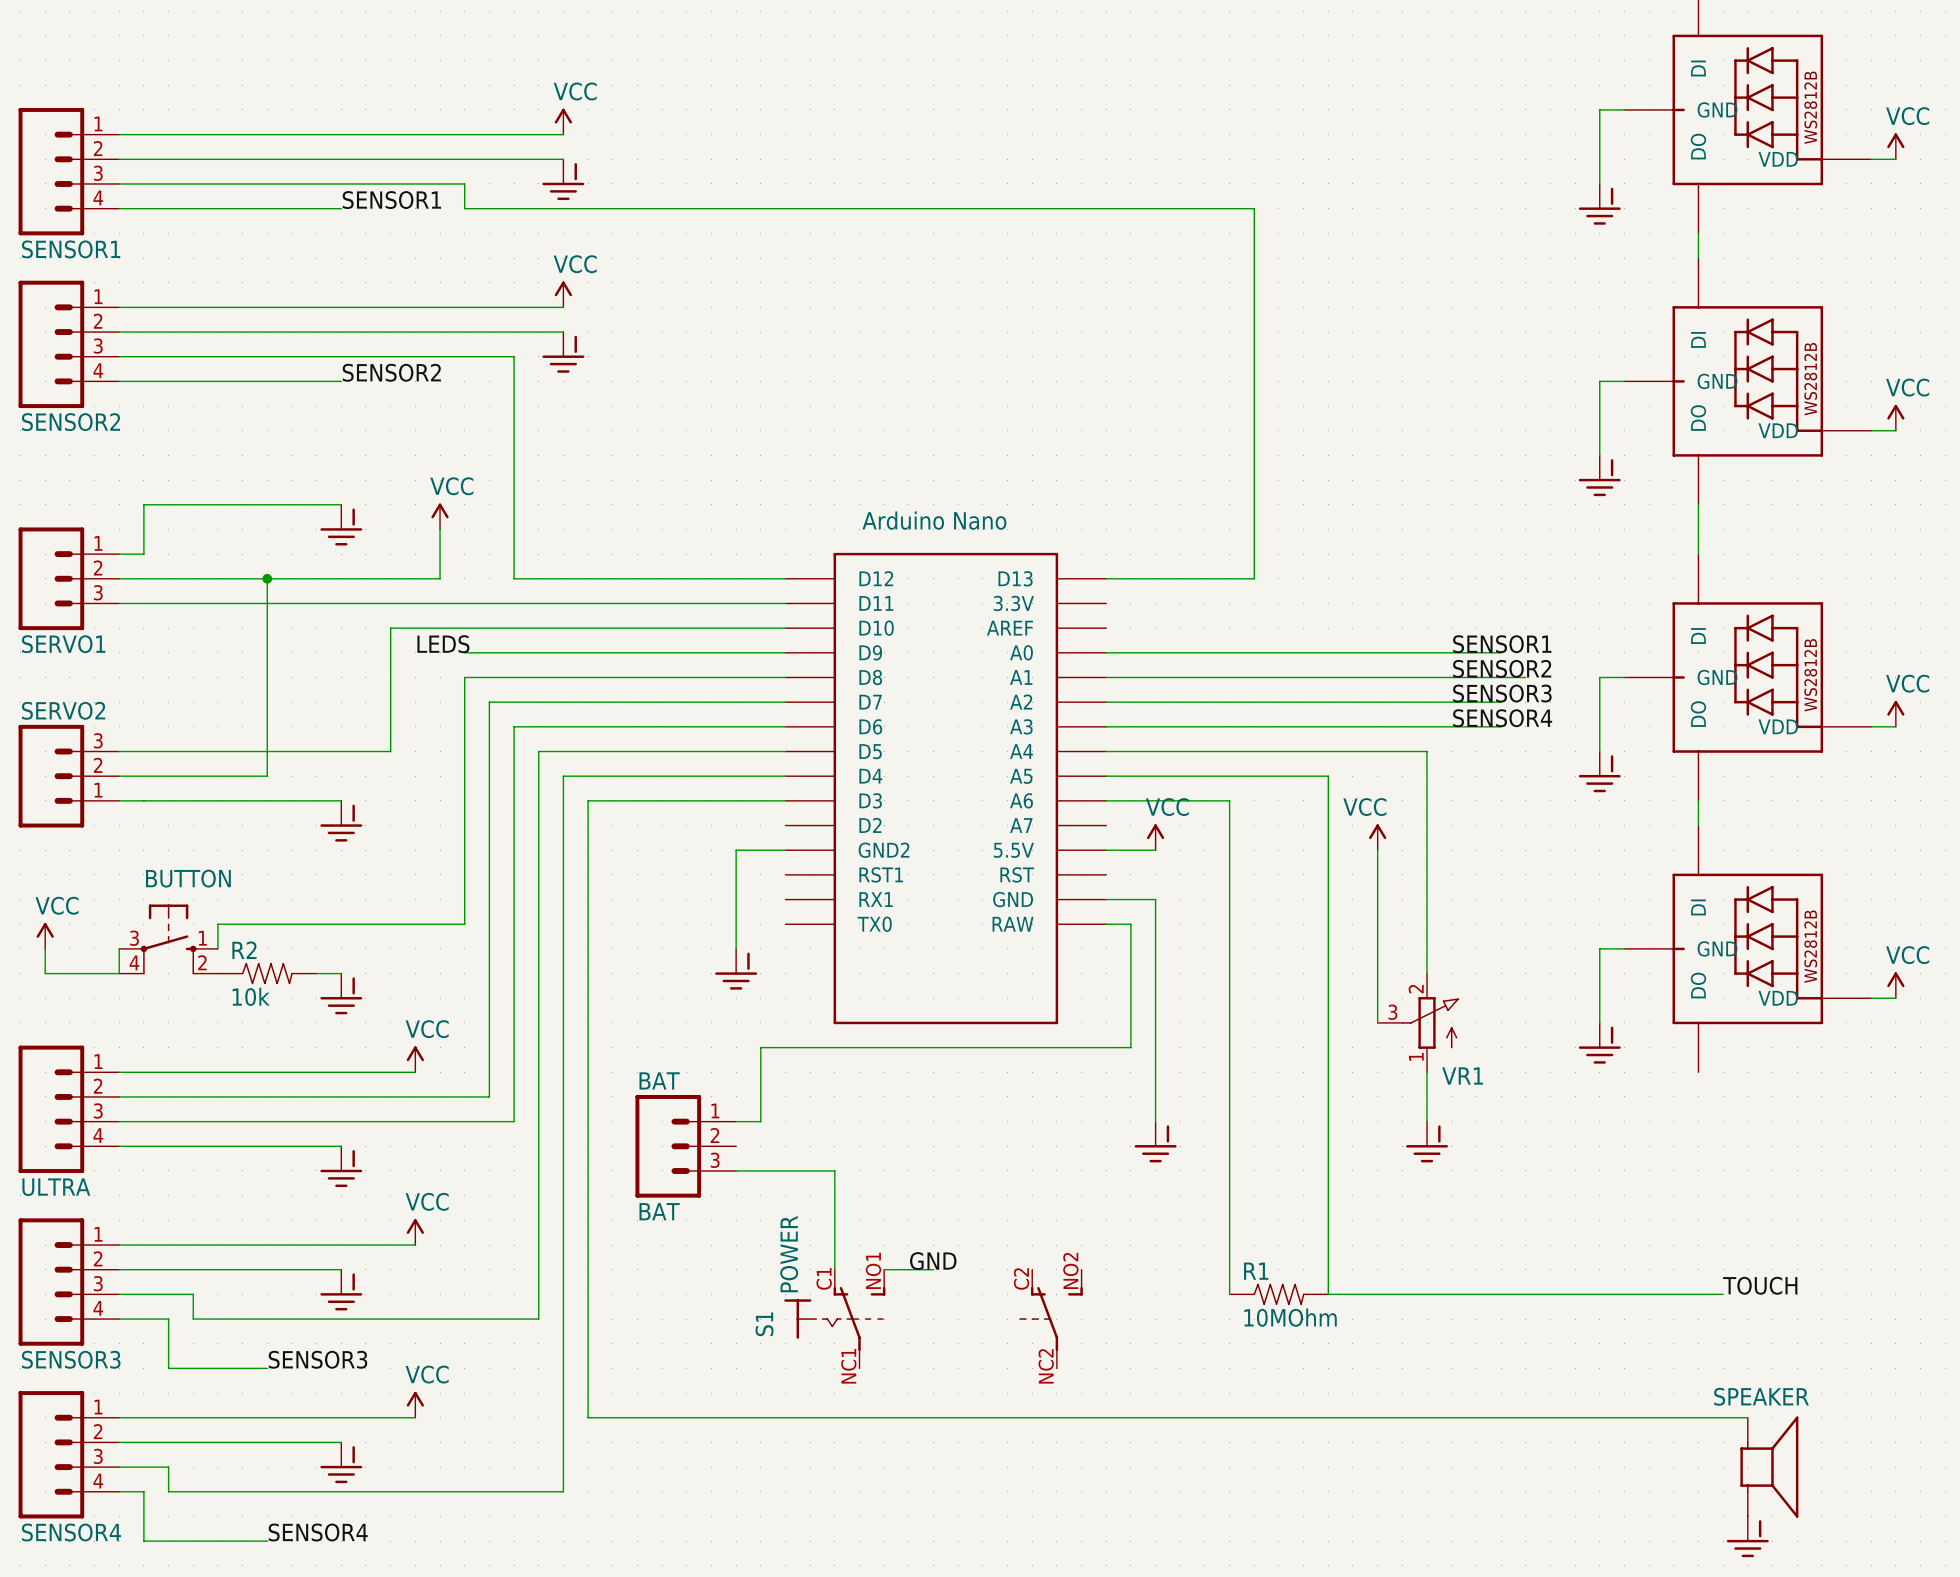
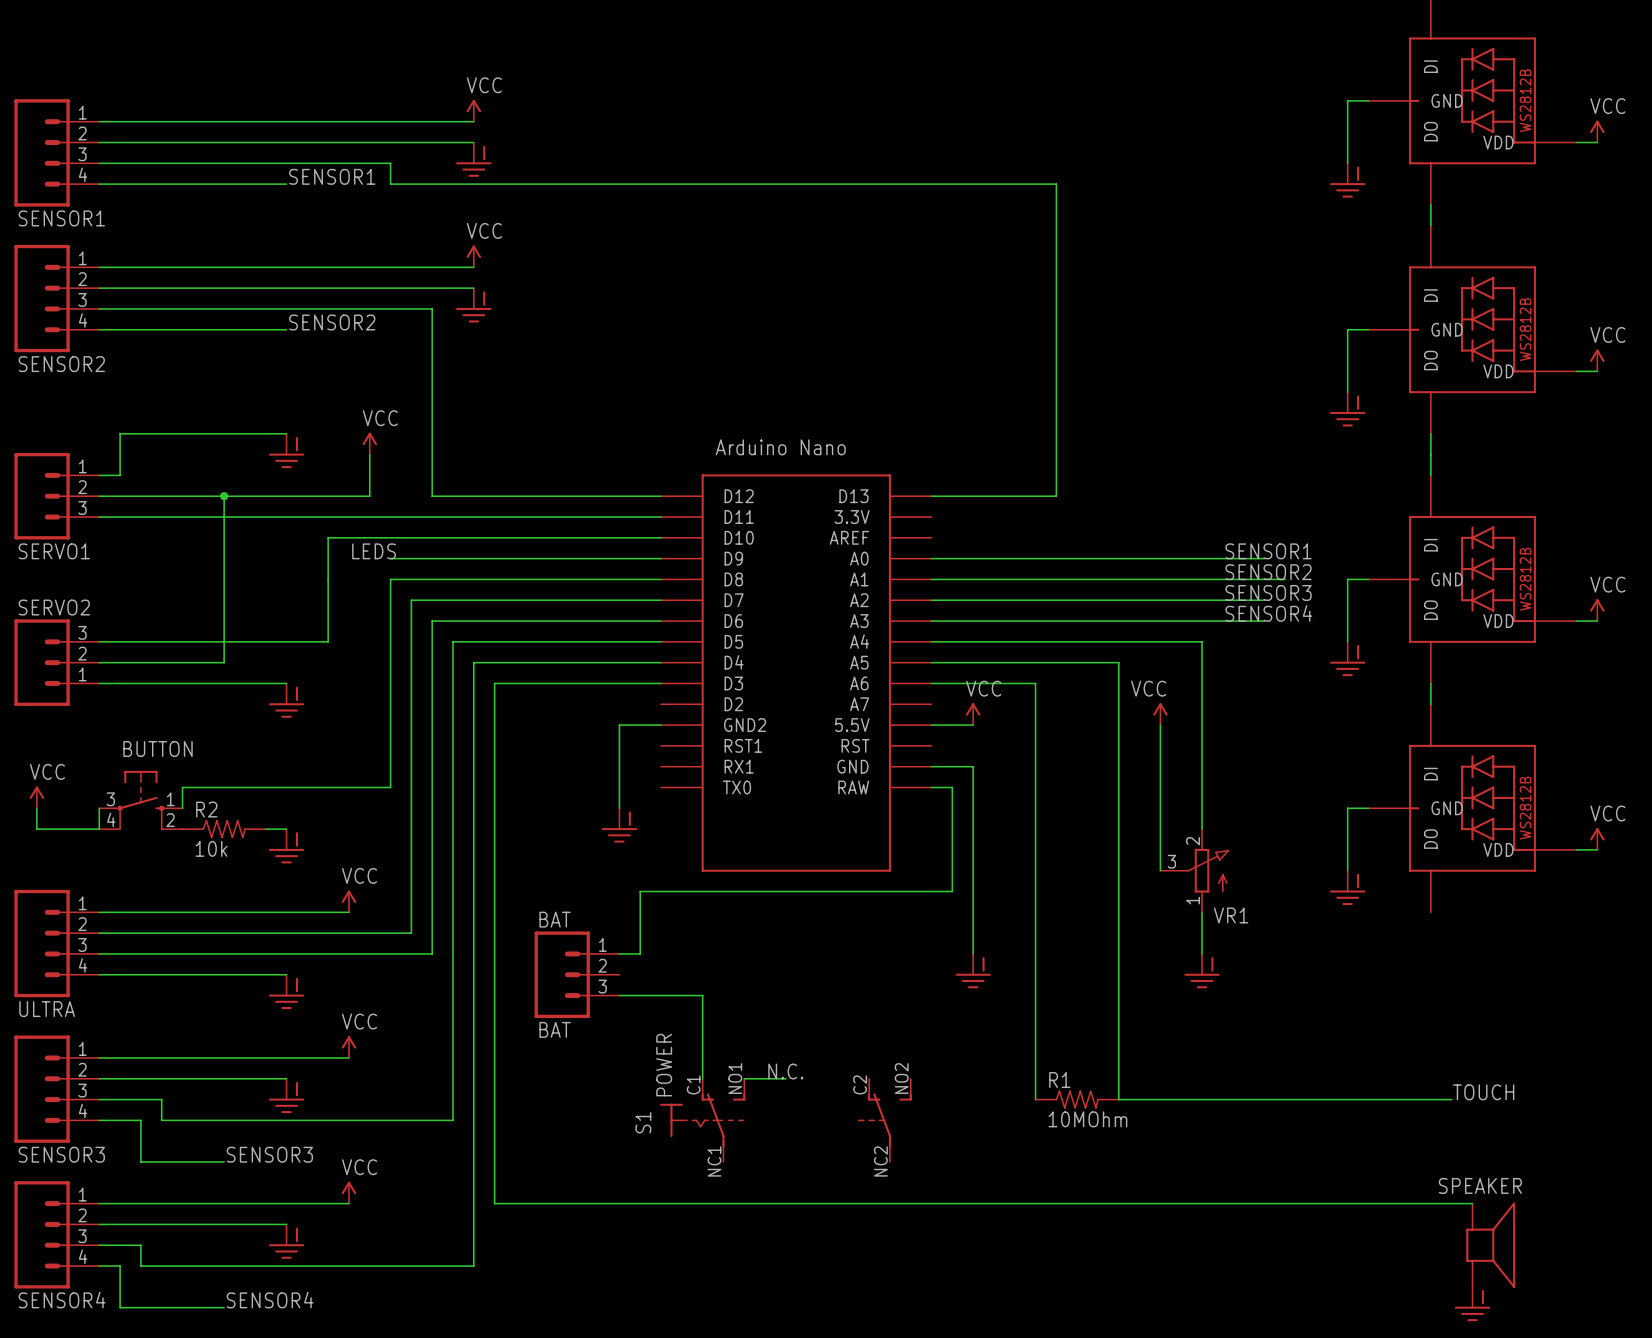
label: GND (933, 1261) -> N.C. (785, 1071)

